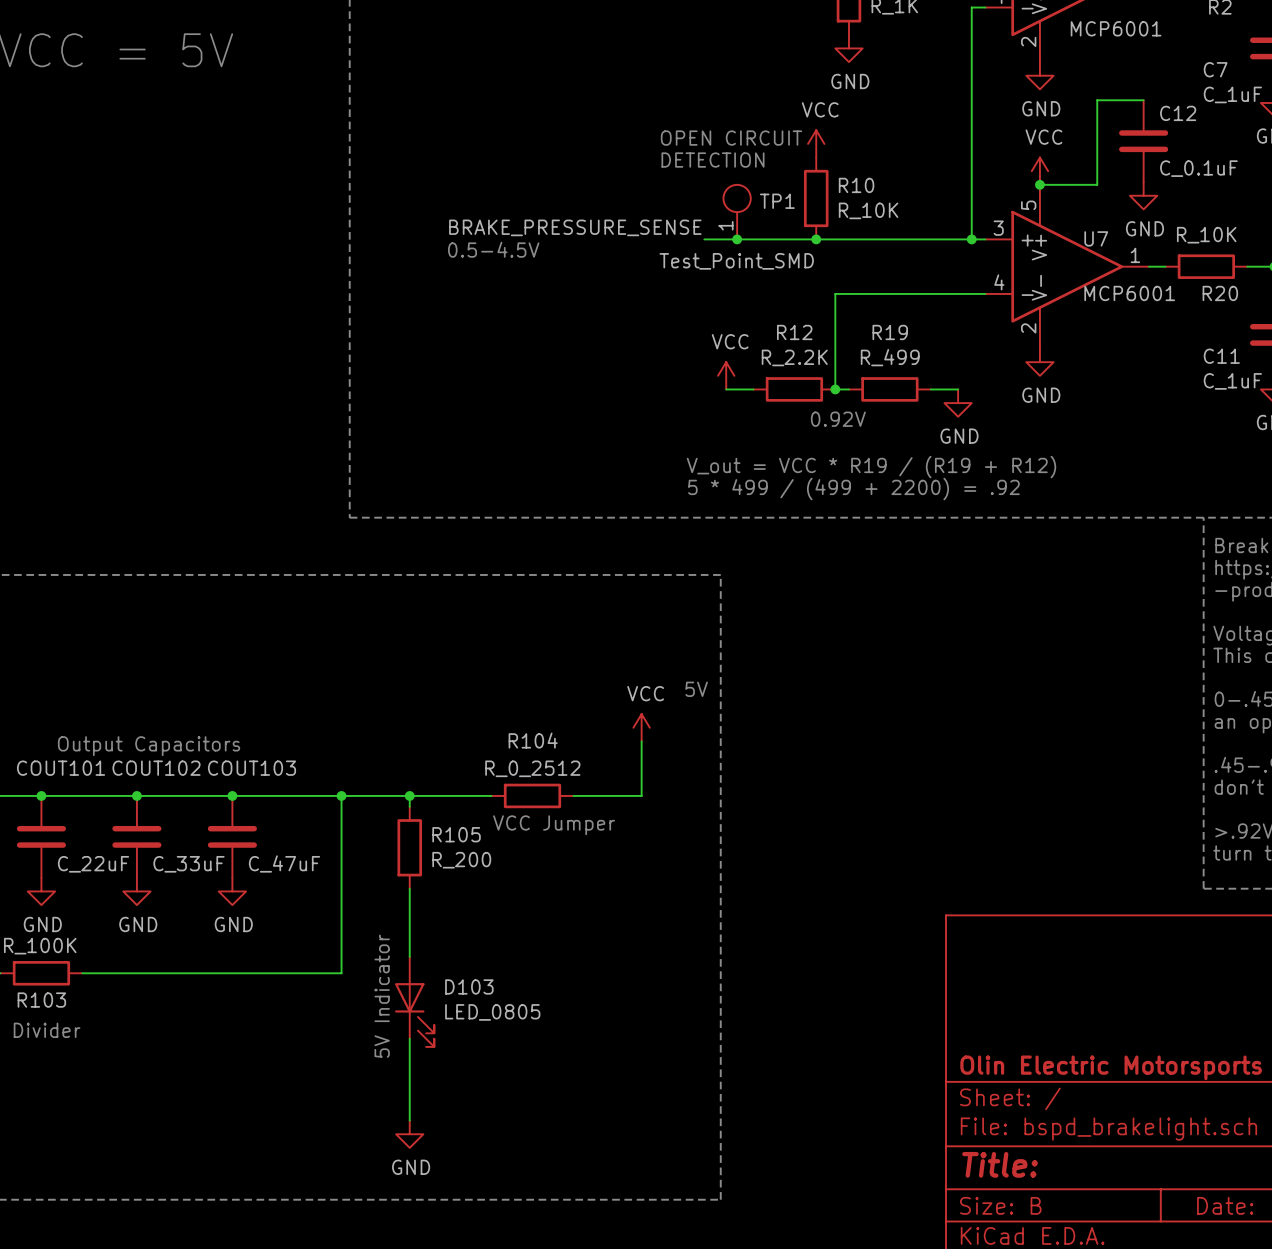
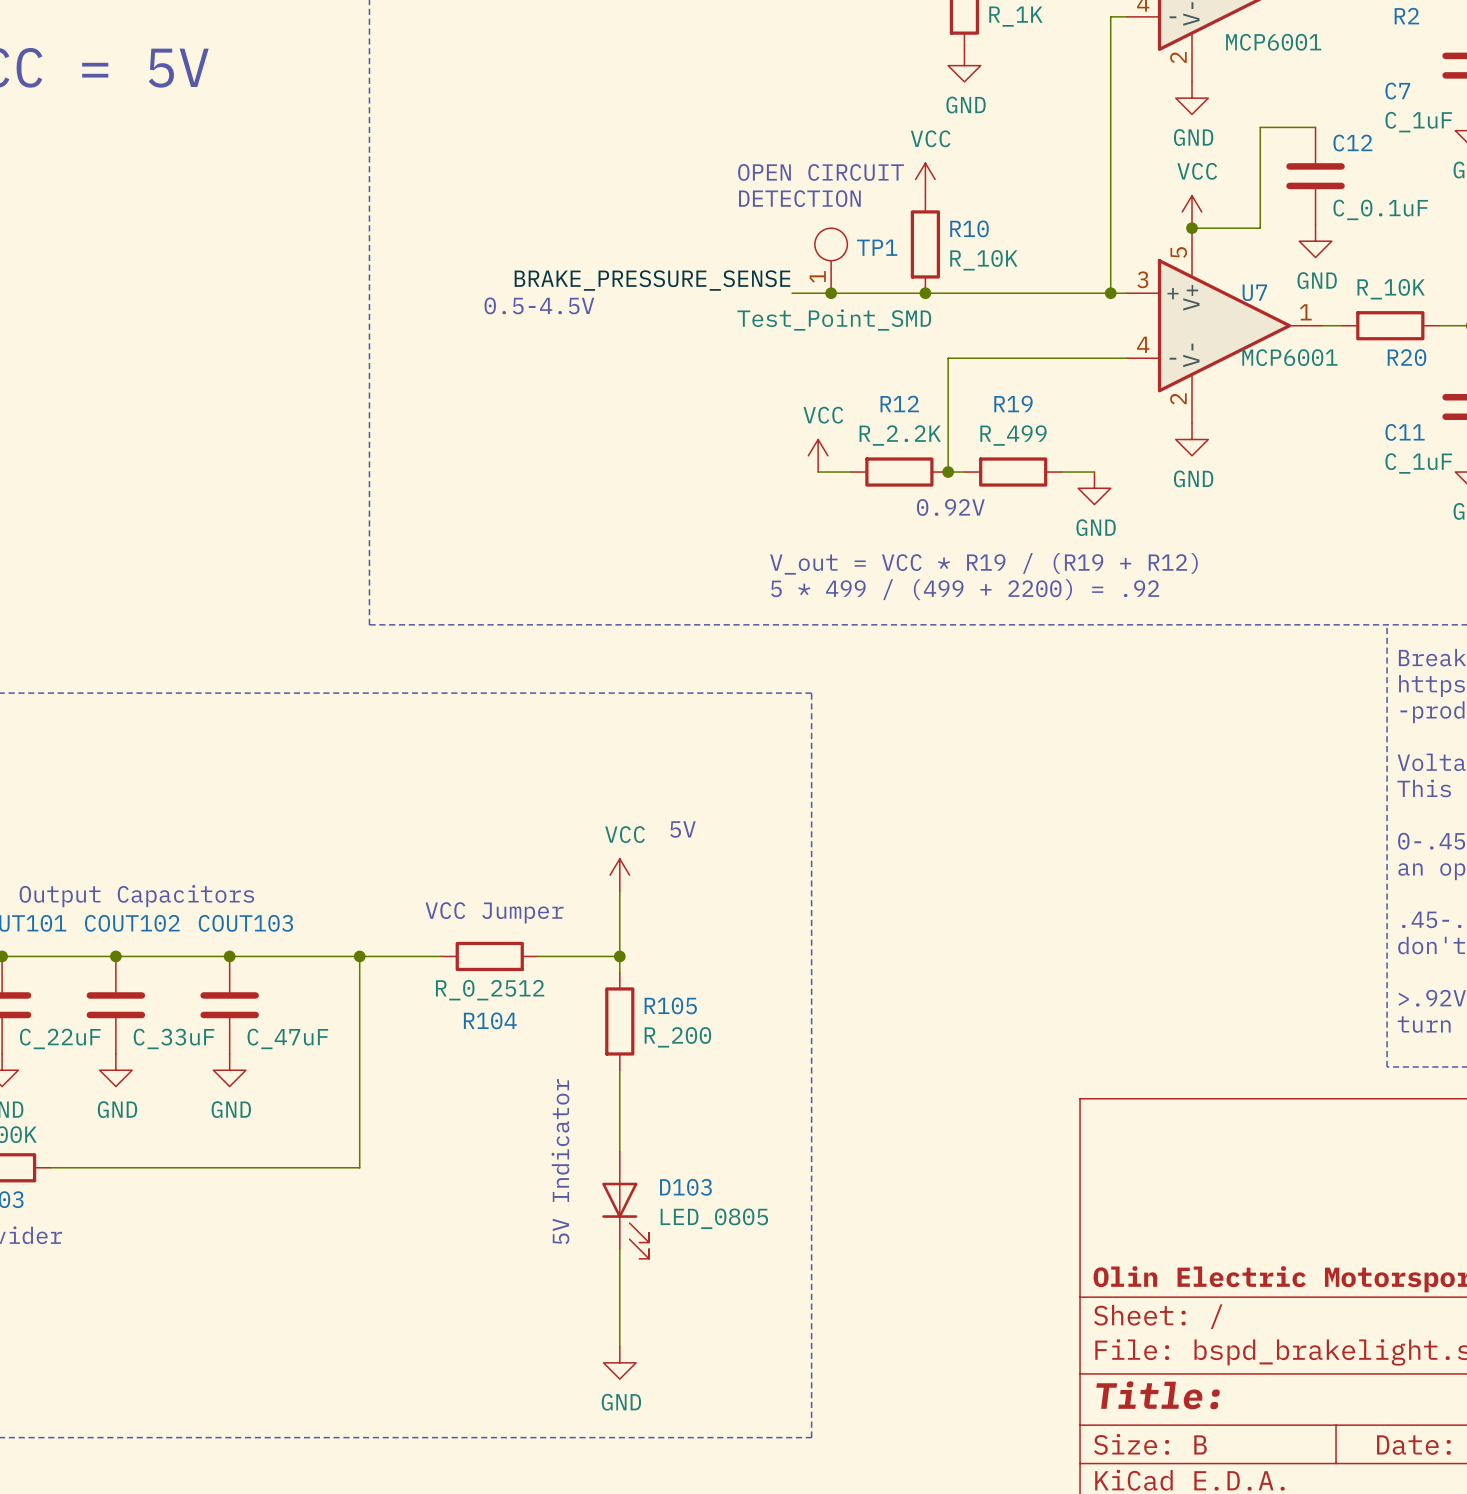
text position: 5V (696, 689) -> 5V (682, 829)
power symbol position: VCC (641, 727) -> VCC (619, 875)
R104 name position: R104 (533, 740) -> R104 (490, 1020)
wire: none -> (619, 891) (619, 972)
wire: (641, 741) (641, 795) (573, 795) -> none
R104 value position: R_0_2512 (532, 768) -> R_0_2512 (490, 990)
junction: (409, 795) -> none
wire: (491, 795) (409, 795) (409, 806) -> (538, 956) (619, 956)
R104 position: (532, 795) -> (489, 956)
junction: none -> (619, 956)
text position: VCC Jumper (554, 825) -> VCC Jumper (494, 912)
R105 position: (409, 847) -> (619, 1021)
wire: (409, 888) (409, 956) -> (619, 1070) (619, 1151)
text position: 5V Indicator (382, 996) -> 5V Indicator (560, 1161)
D103 position: (414, 1001) -> (625, 1205)
wire: (409, 1038) (409, 1120) -> (619, 1249) (619, 1346)
power symbol position: GND (409, 1134) -> GND (619, 1362)

